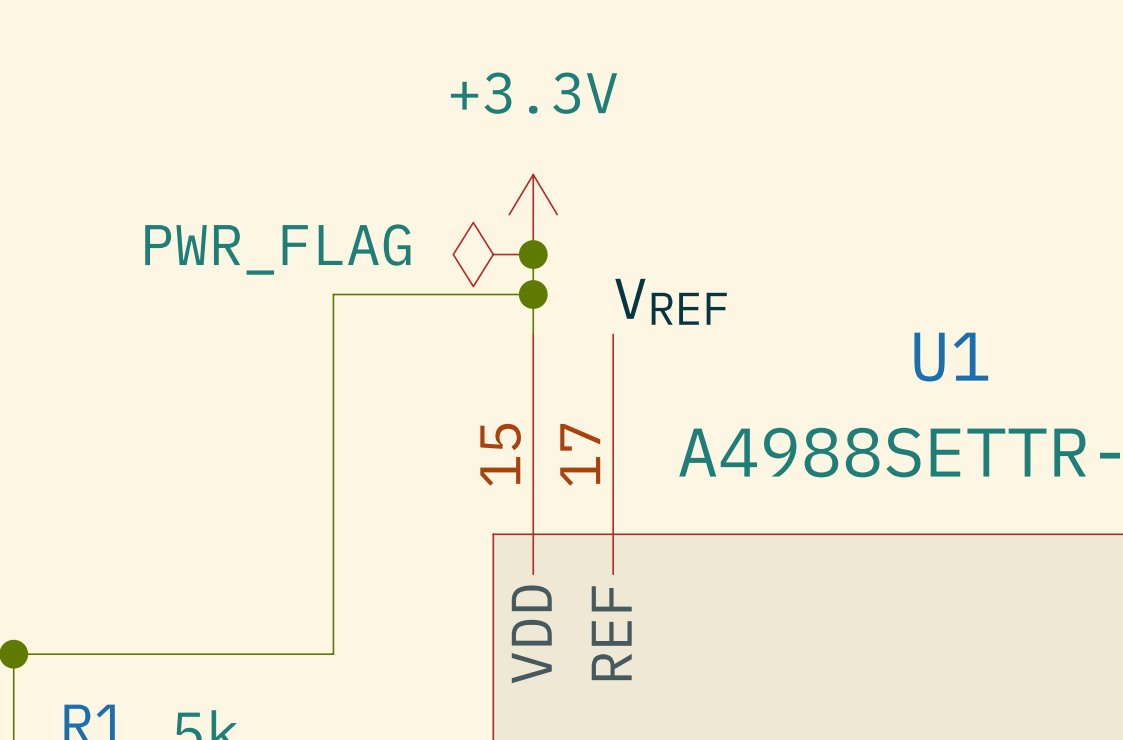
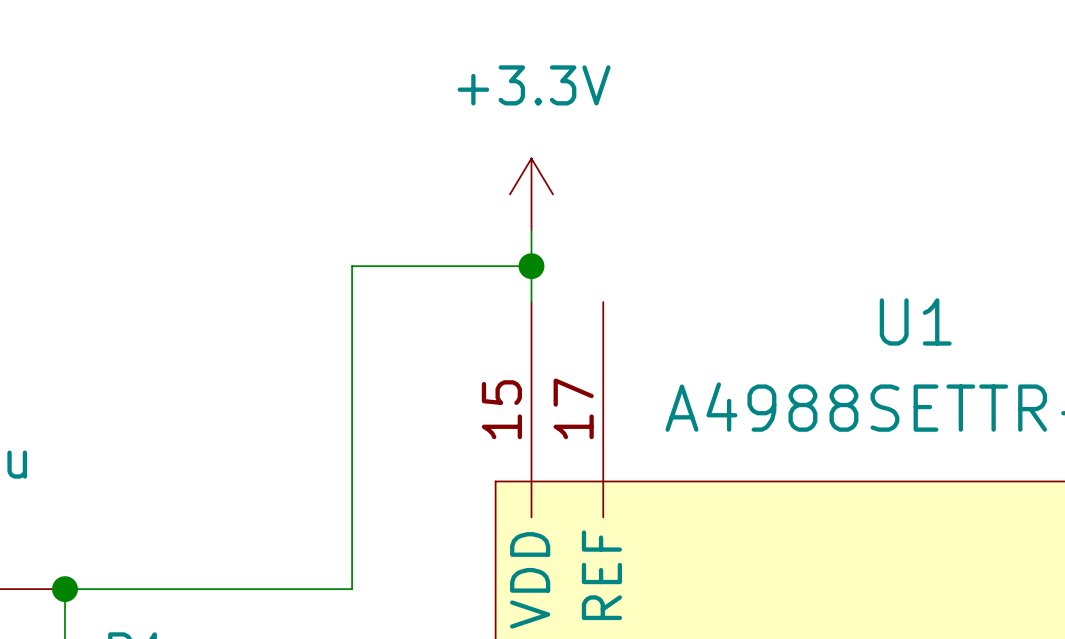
power symbol: PWR_FLAG (493, 254) -> none
junction: (533, 254) -> none
label: VREF (671, 301) -> none

